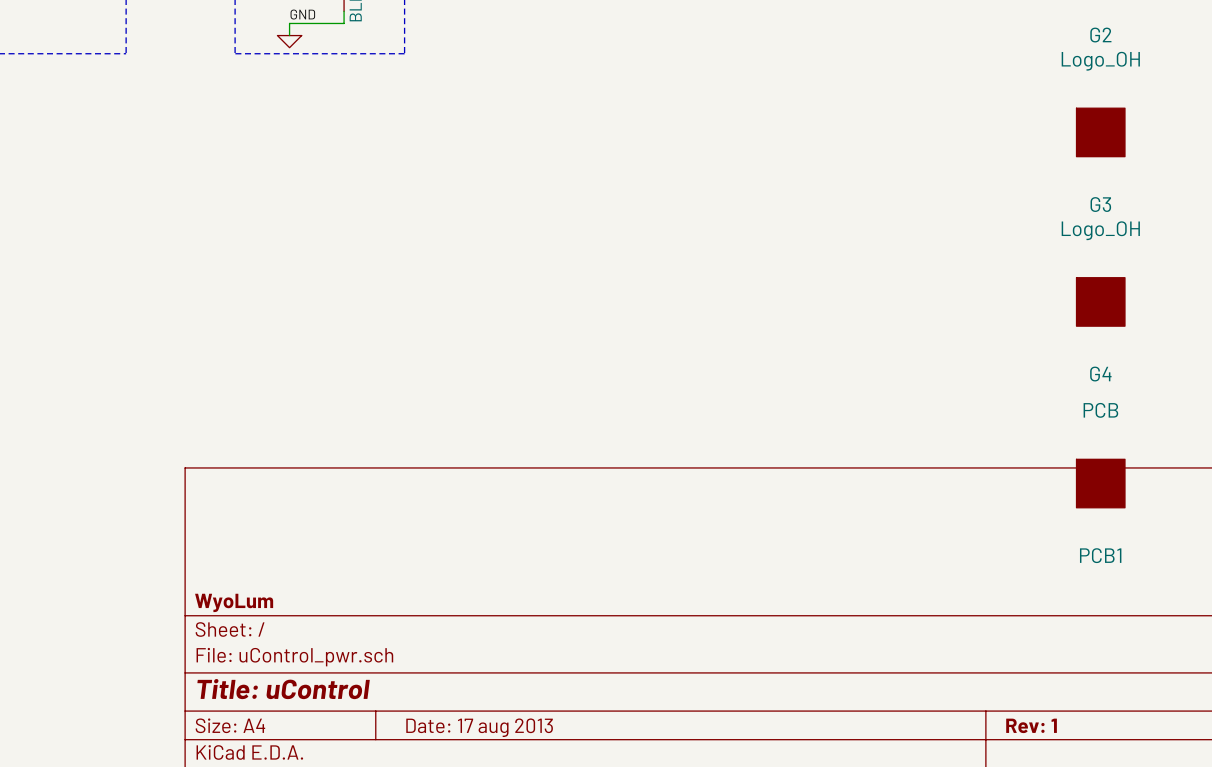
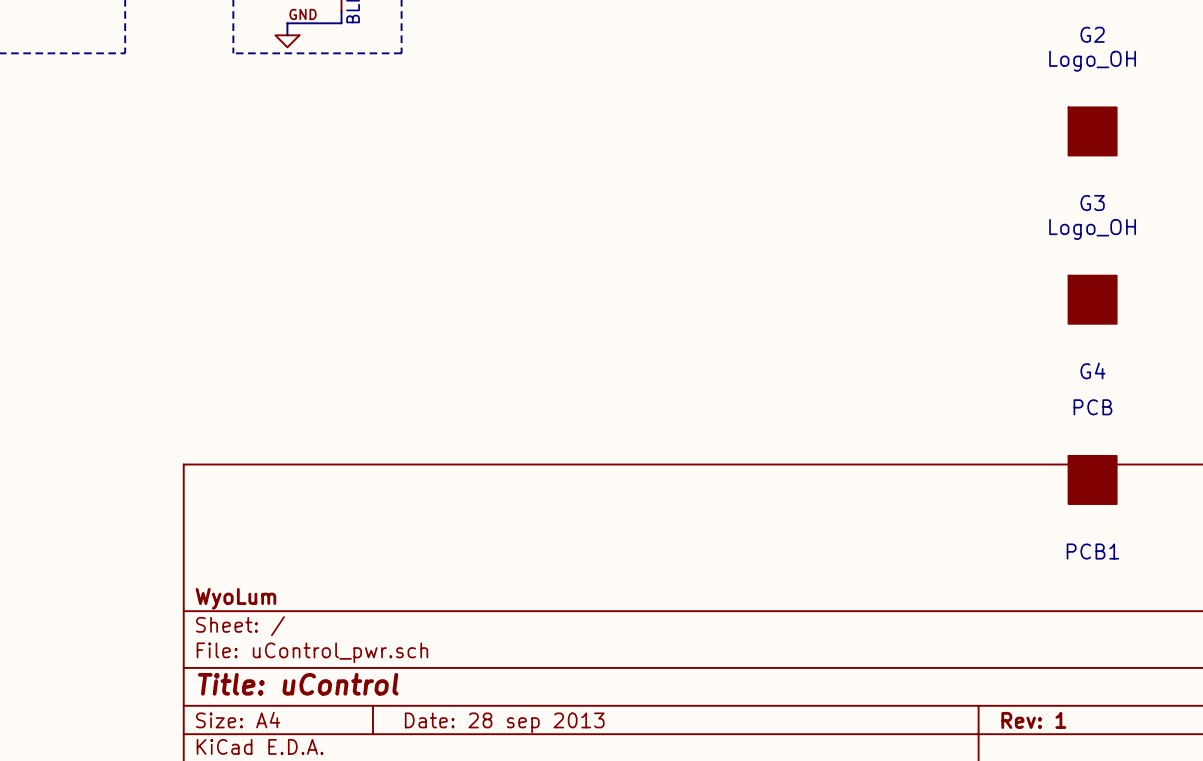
title block: Date: 17 aug 2013 (479, 727) -> Date: 28 sep 2013 (504, 722)

